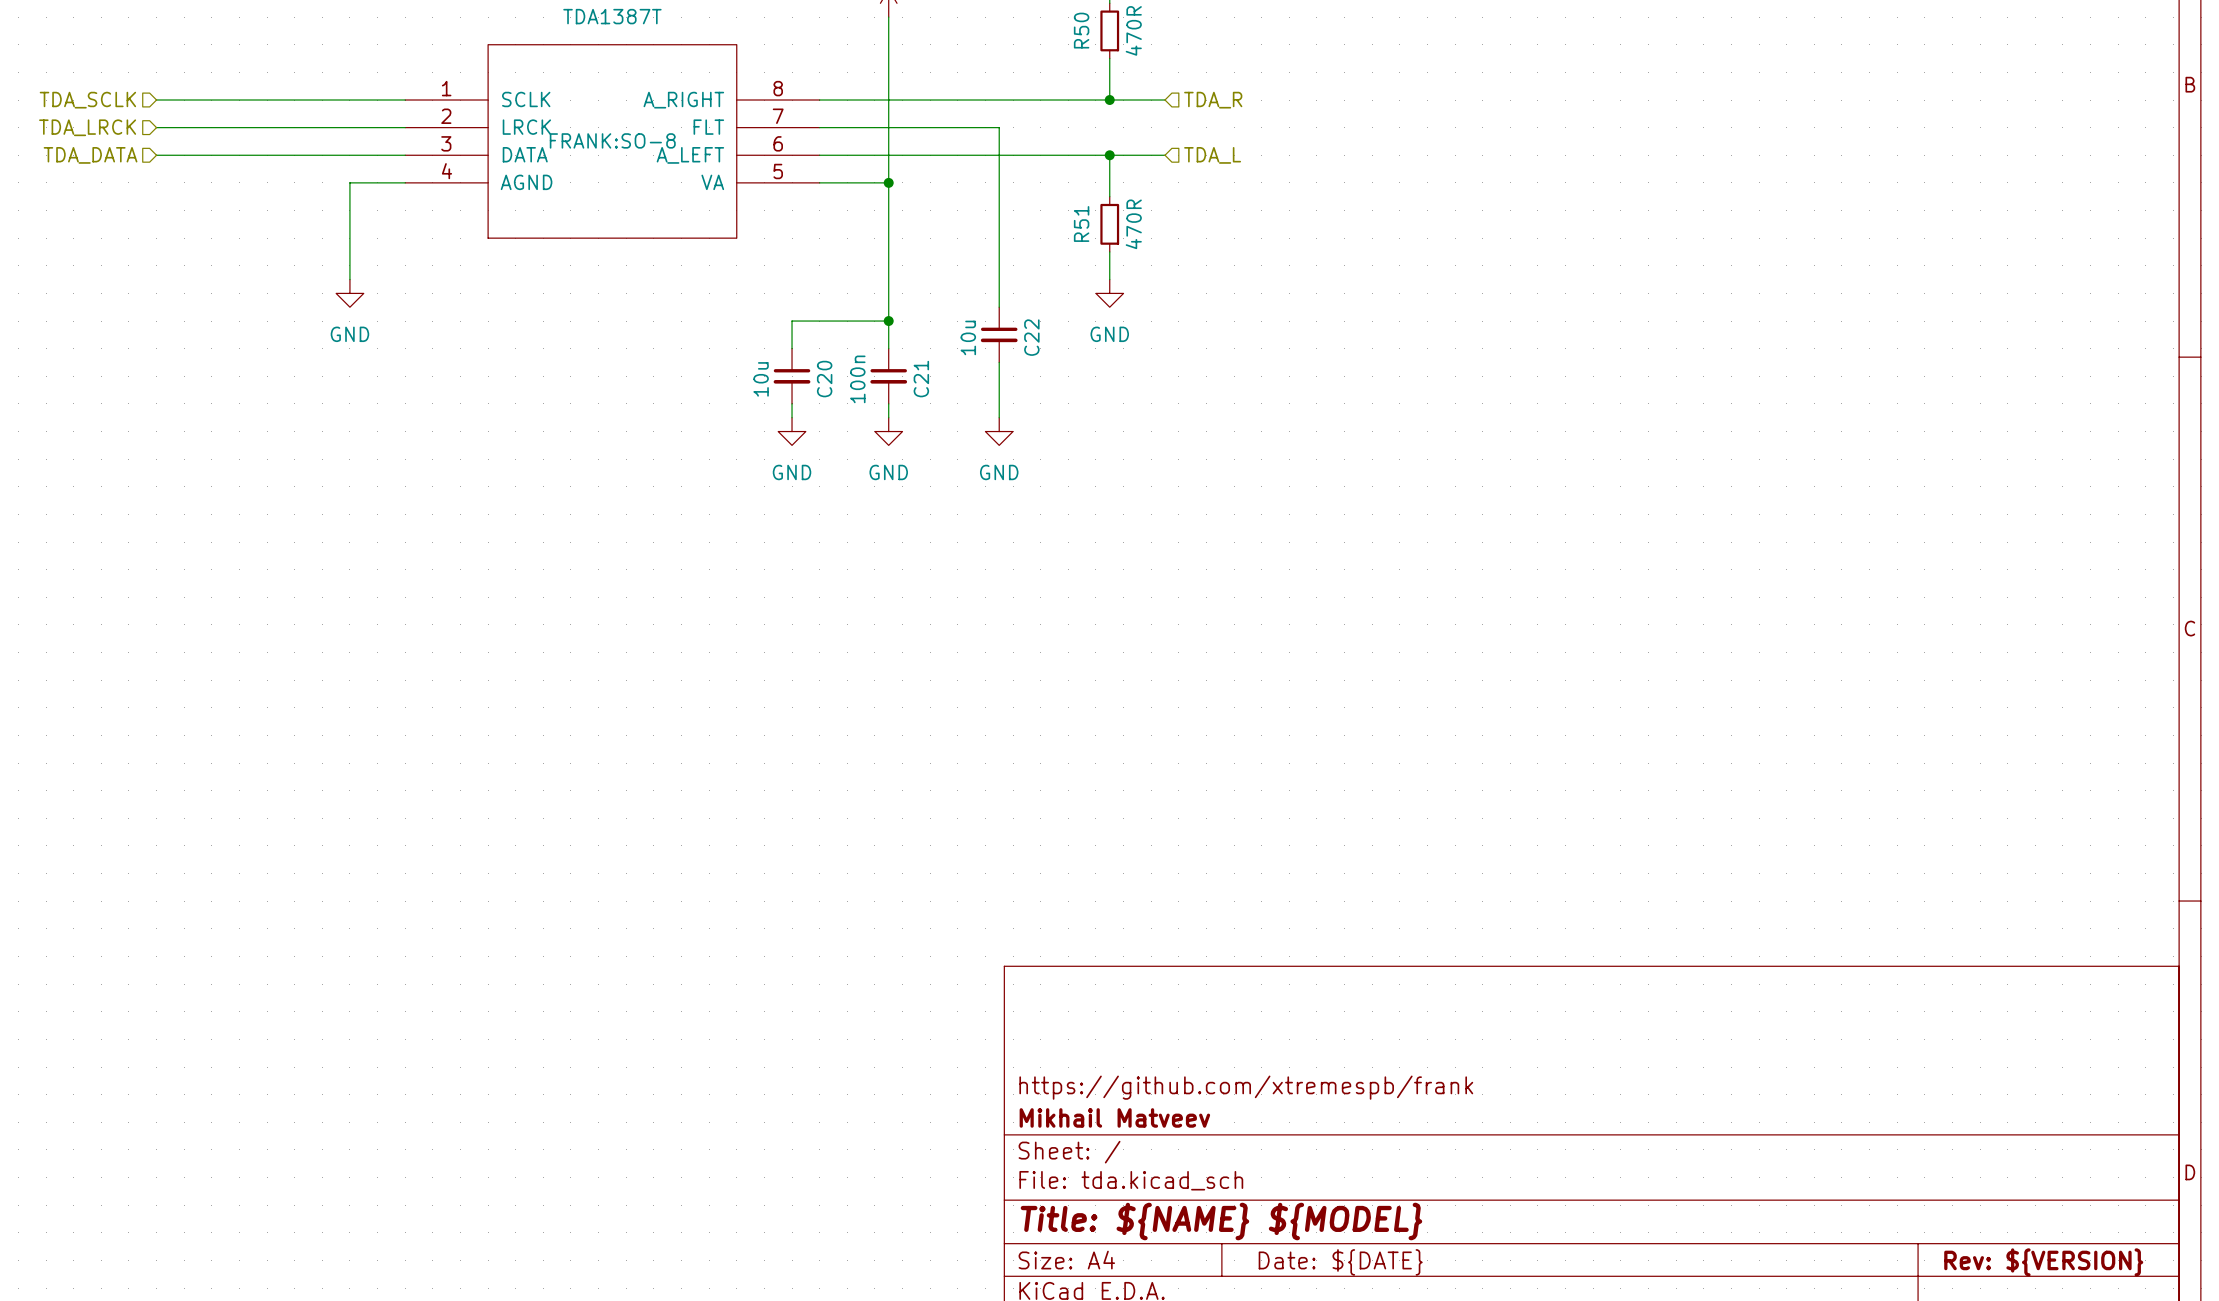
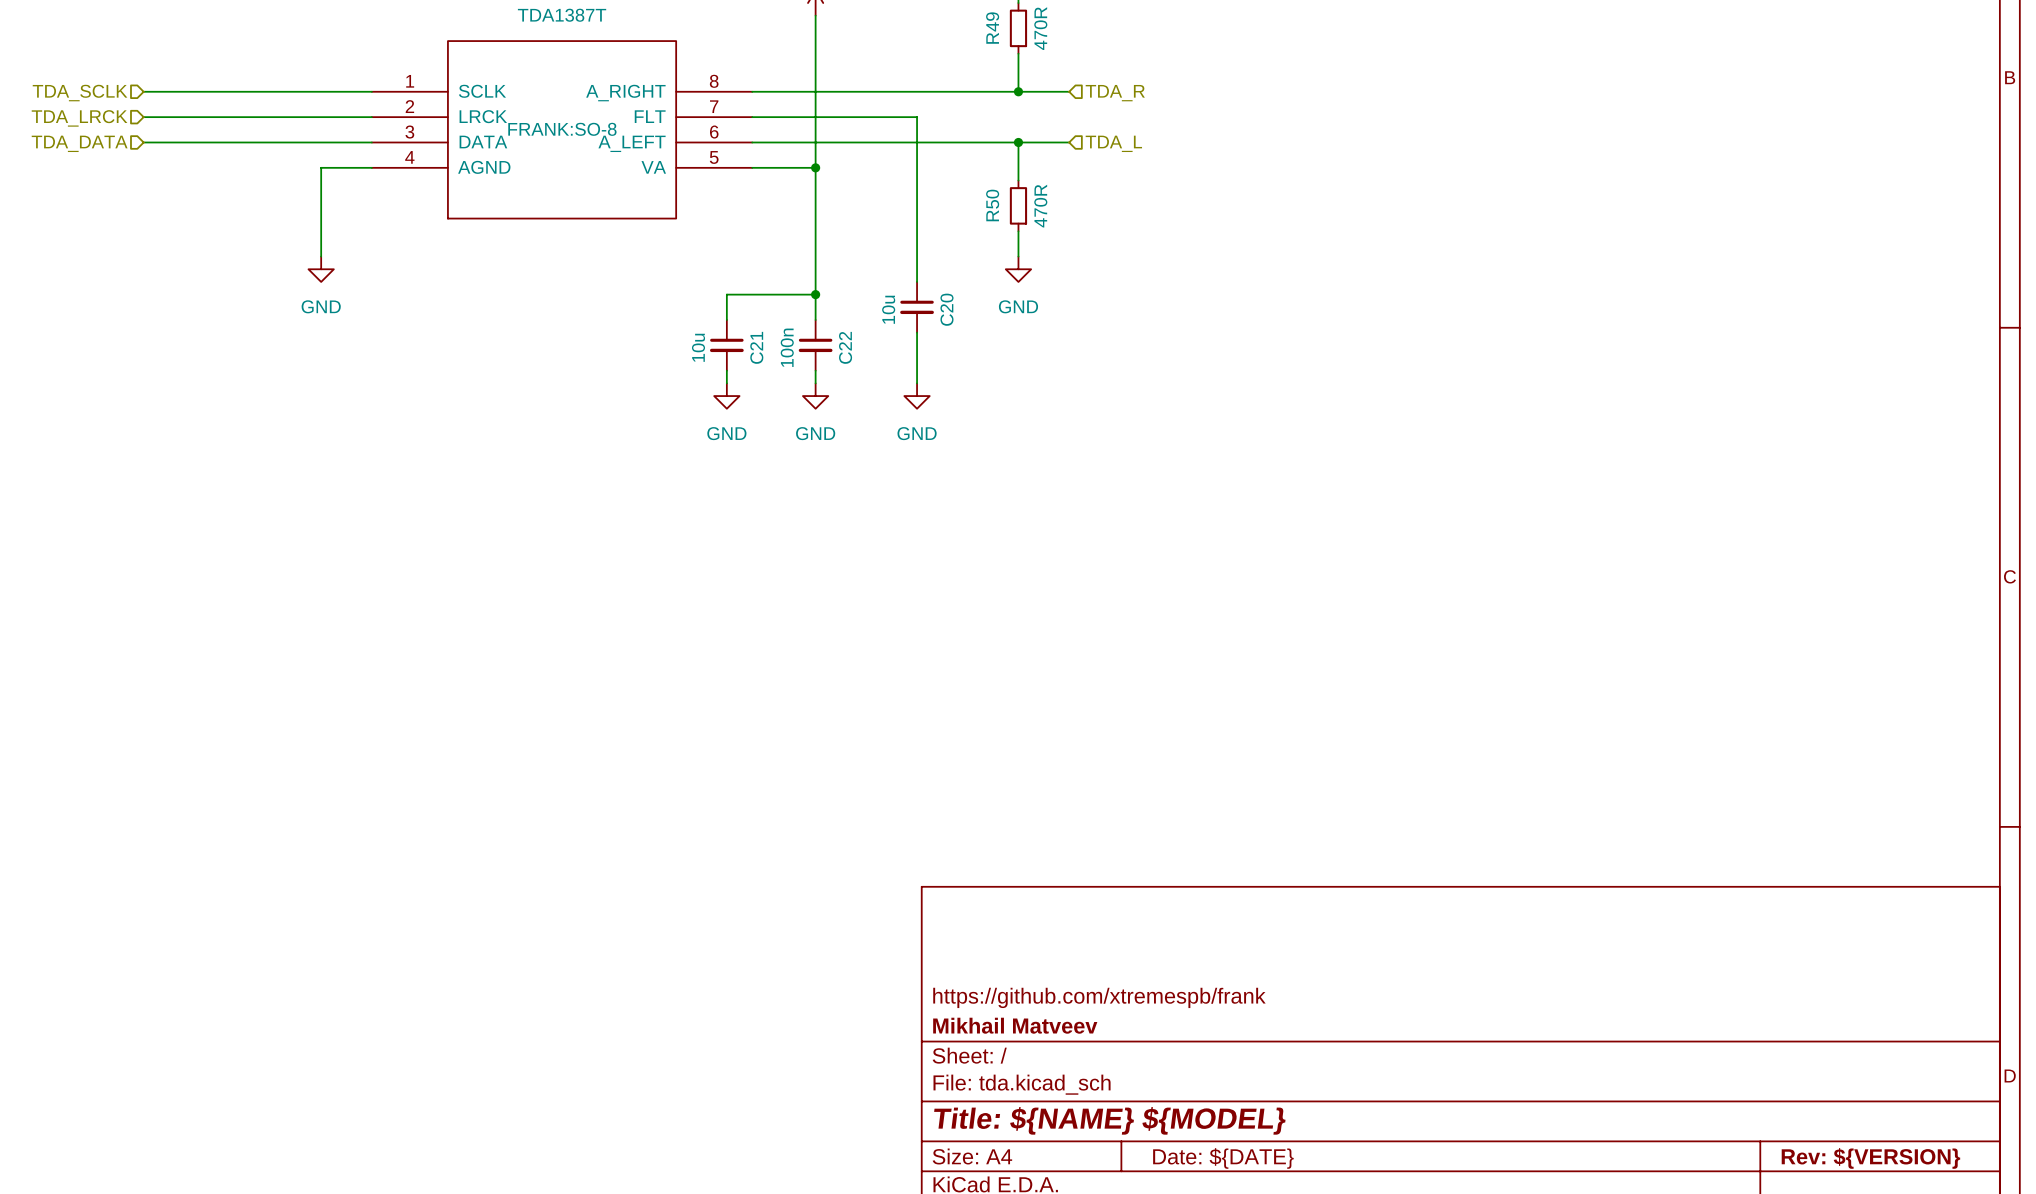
R50 name: R50 (1081, 30) -> R49 (992, 28)
R51 name: R51 (1081, 224) -> R50 (992, 205)
C22 name: C22 (1031, 337) -> C20 (946, 309)
C20 name: C20 (824, 379) -> C21 (756, 347)
C21 name: C21 (921, 379) -> C22 (845, 347)

